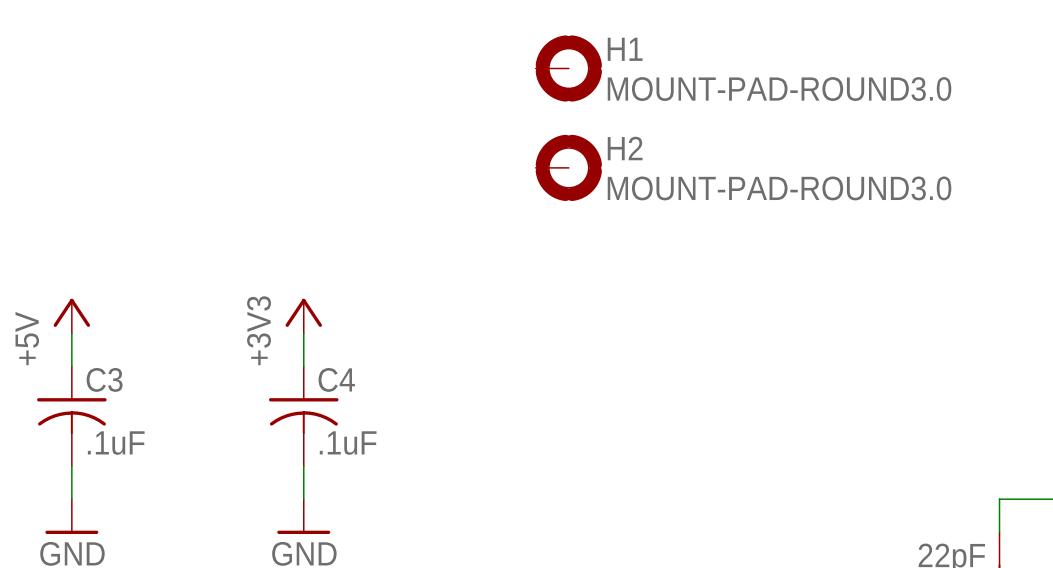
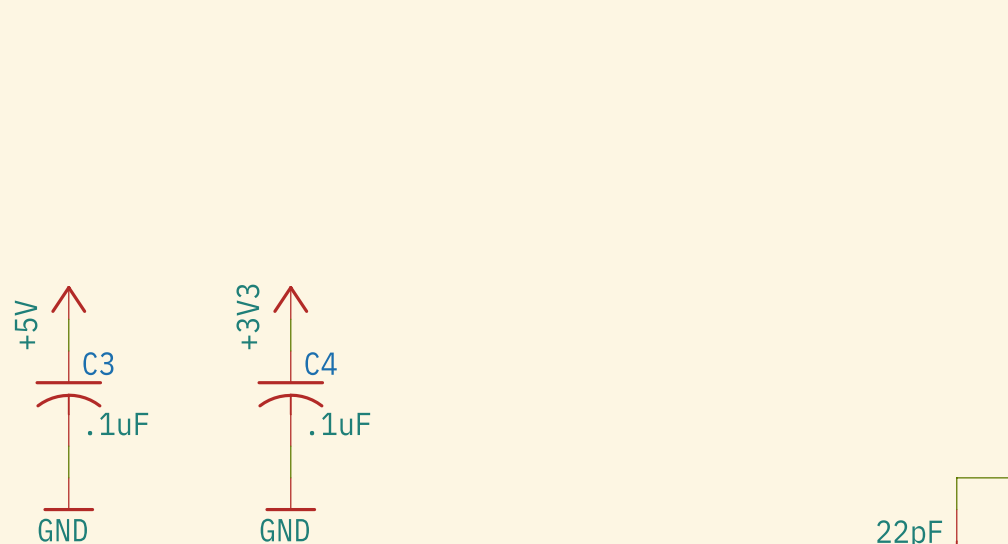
H1: MOUNT-PAD-ROUND3.0 (568, 68) -> none
H2: MOUNT-PAD-ROUND3.0 (568, 167) -> none

